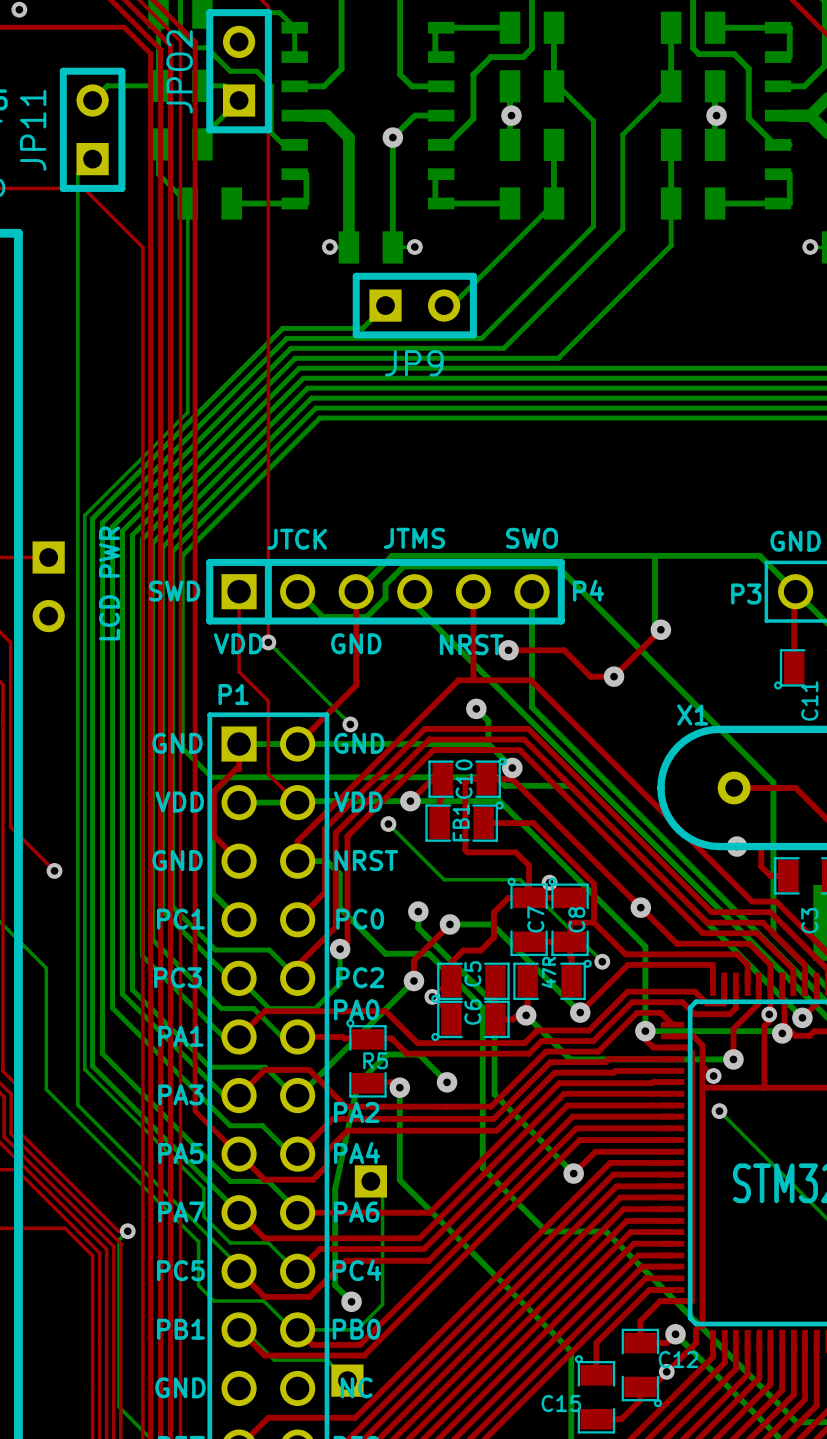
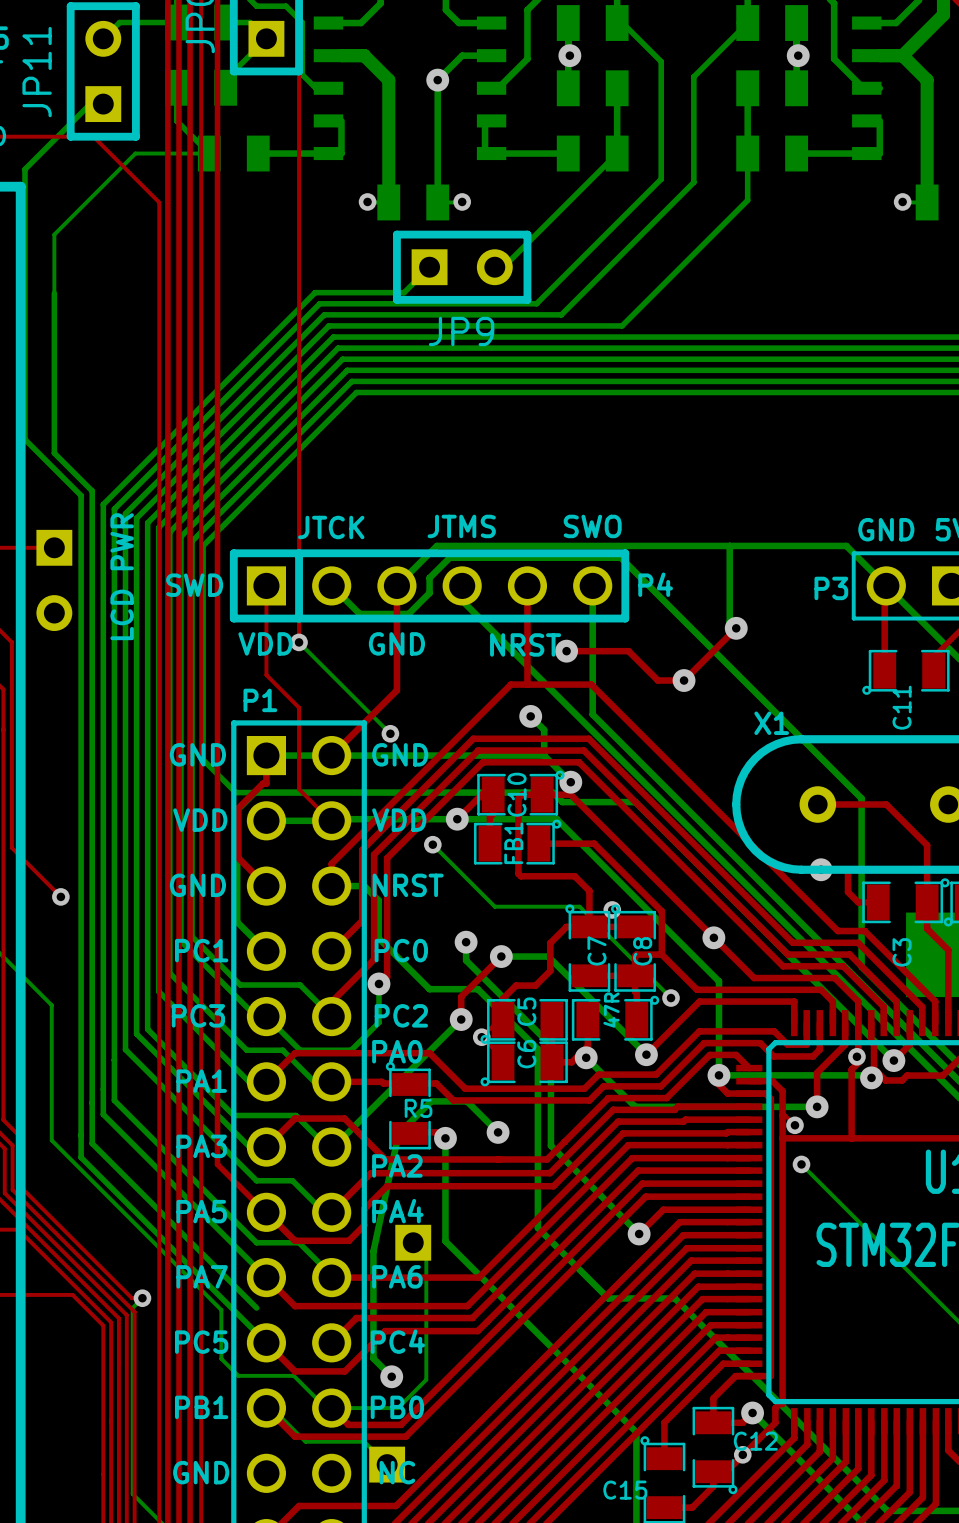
bottom track: (92, 159) (77, 173) (77, 1105) (239, 1266) (239, 1271) -> (103, 104) (90, 104) (24, 169) (24, 439) (81, 495) (81, 1157) (266, 1342)
bottom track: (187, 203) (187, 412) (84, 515) (84, 1069) (203, 1188) (203, 1216) (230, 1242) (268, 1242) (297, 1271) -> (209, 153) (135, 153) (54, 234) (54, 453) (92, 491) (92, 1143) (256, 1308)

